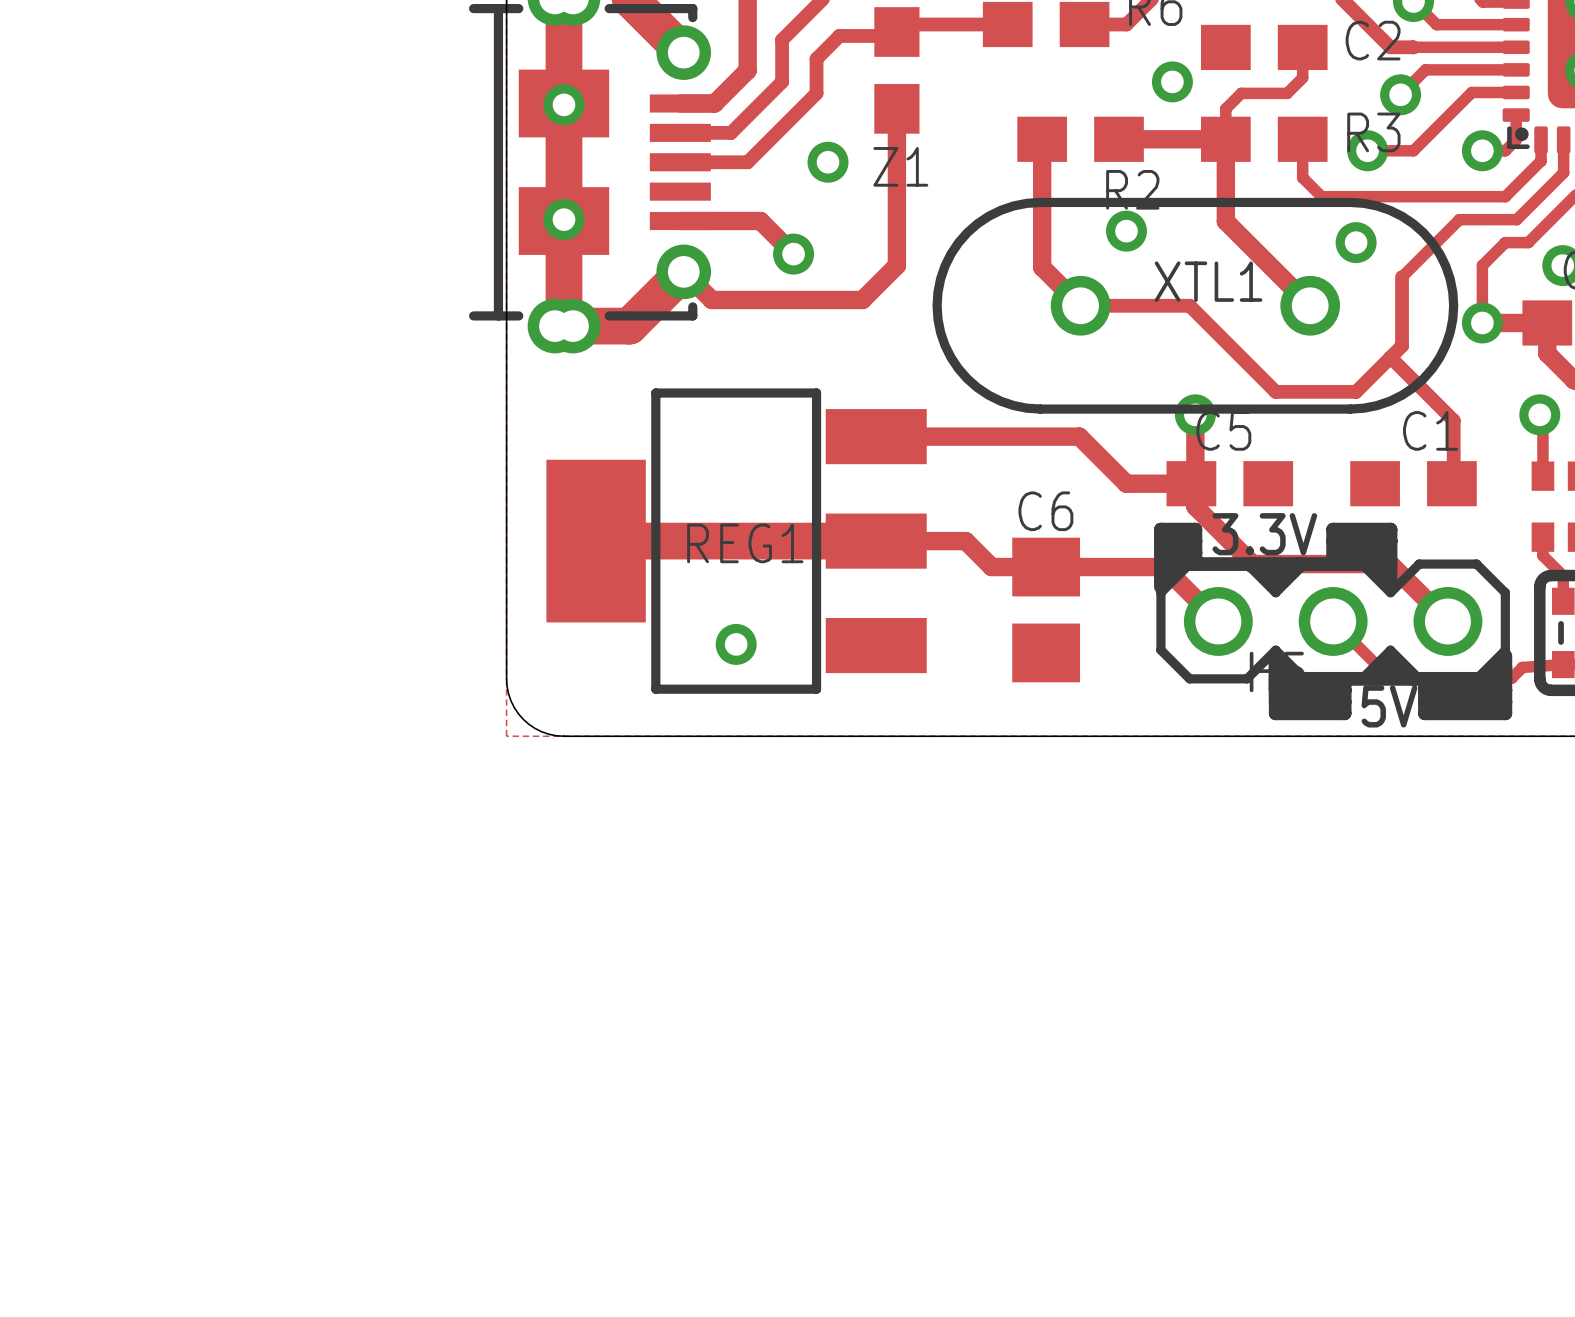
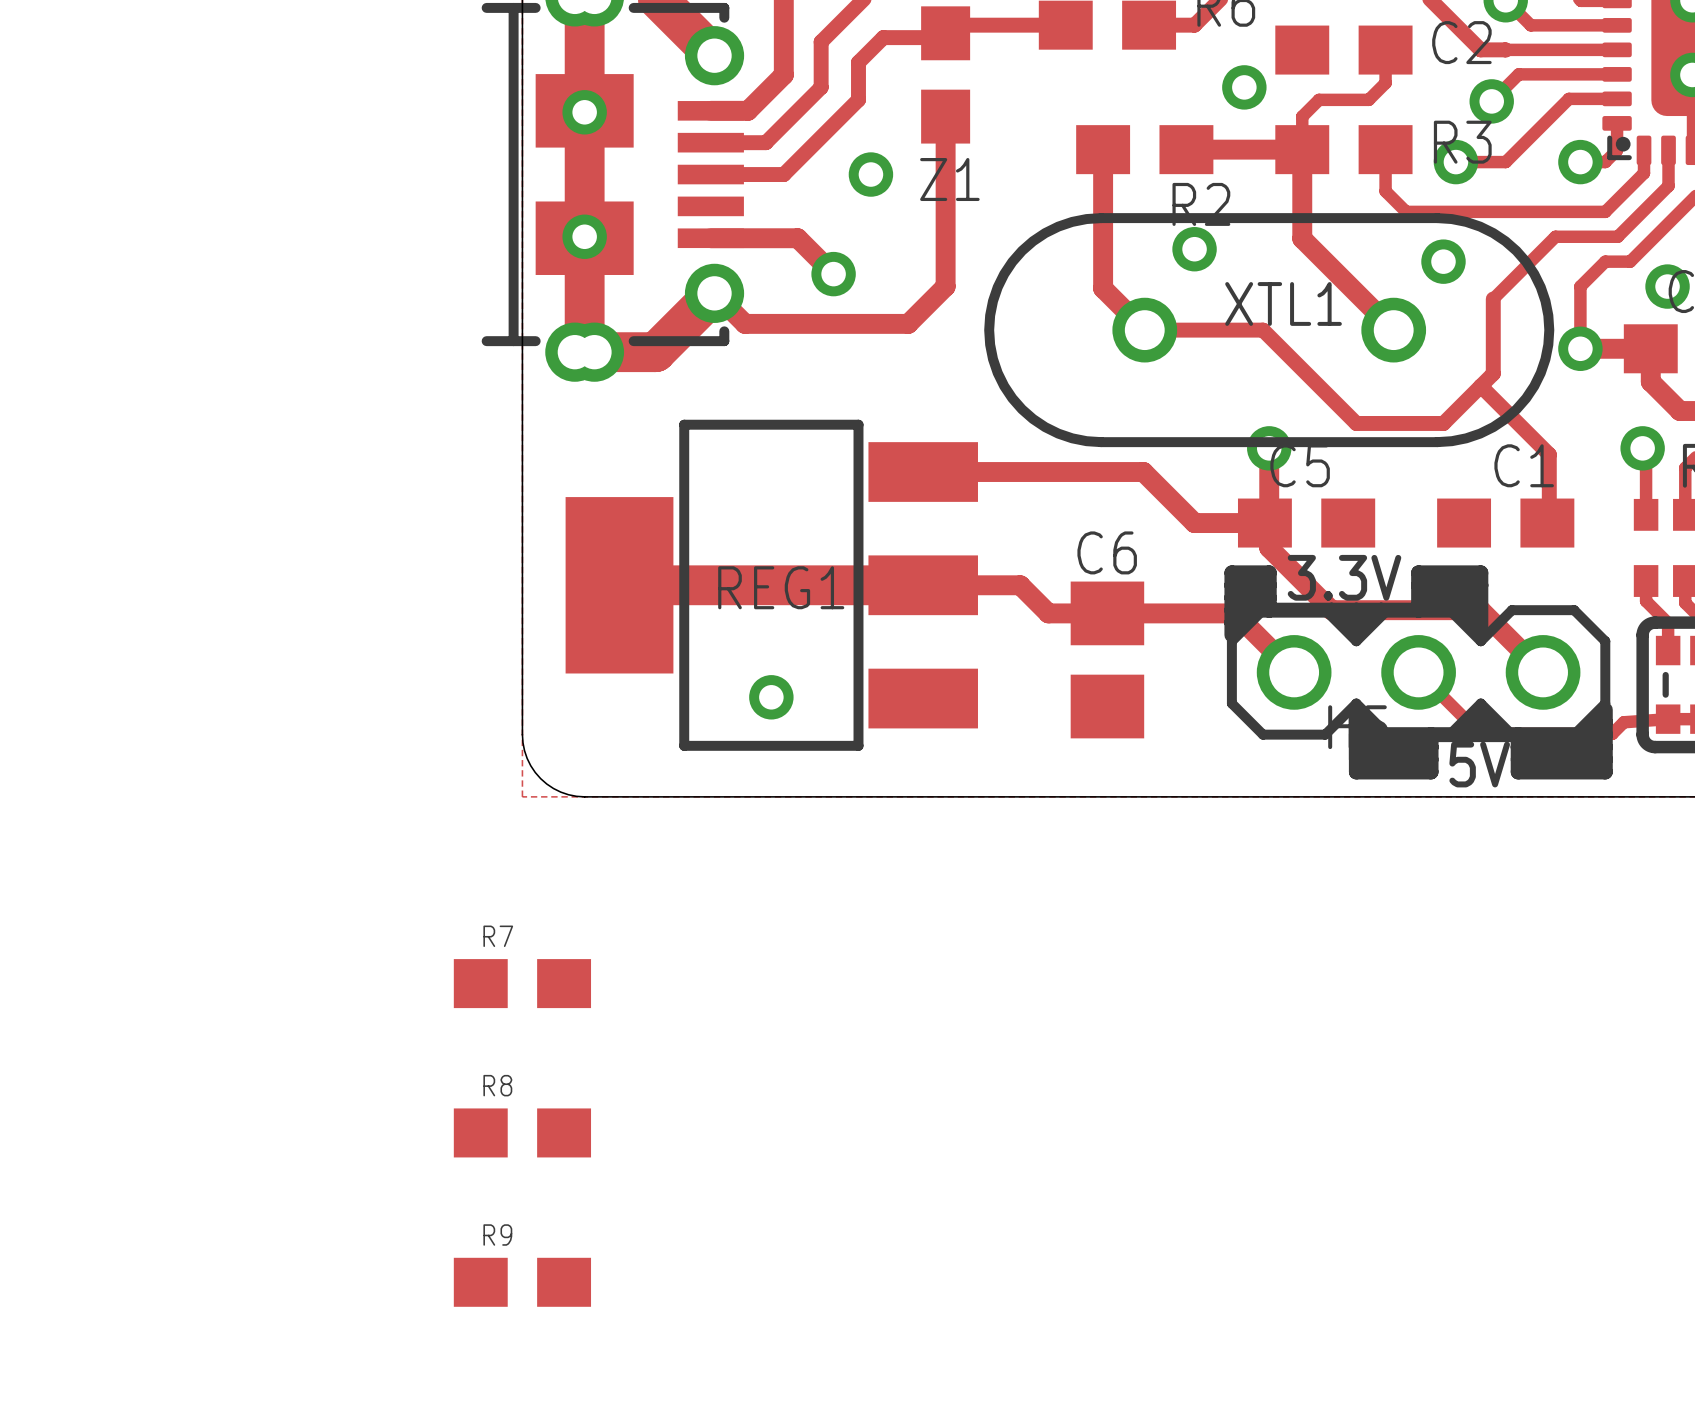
R7: none -> (522, 983)
R8: none -> (522, 1132)
R9: none -> (522, 1282)

